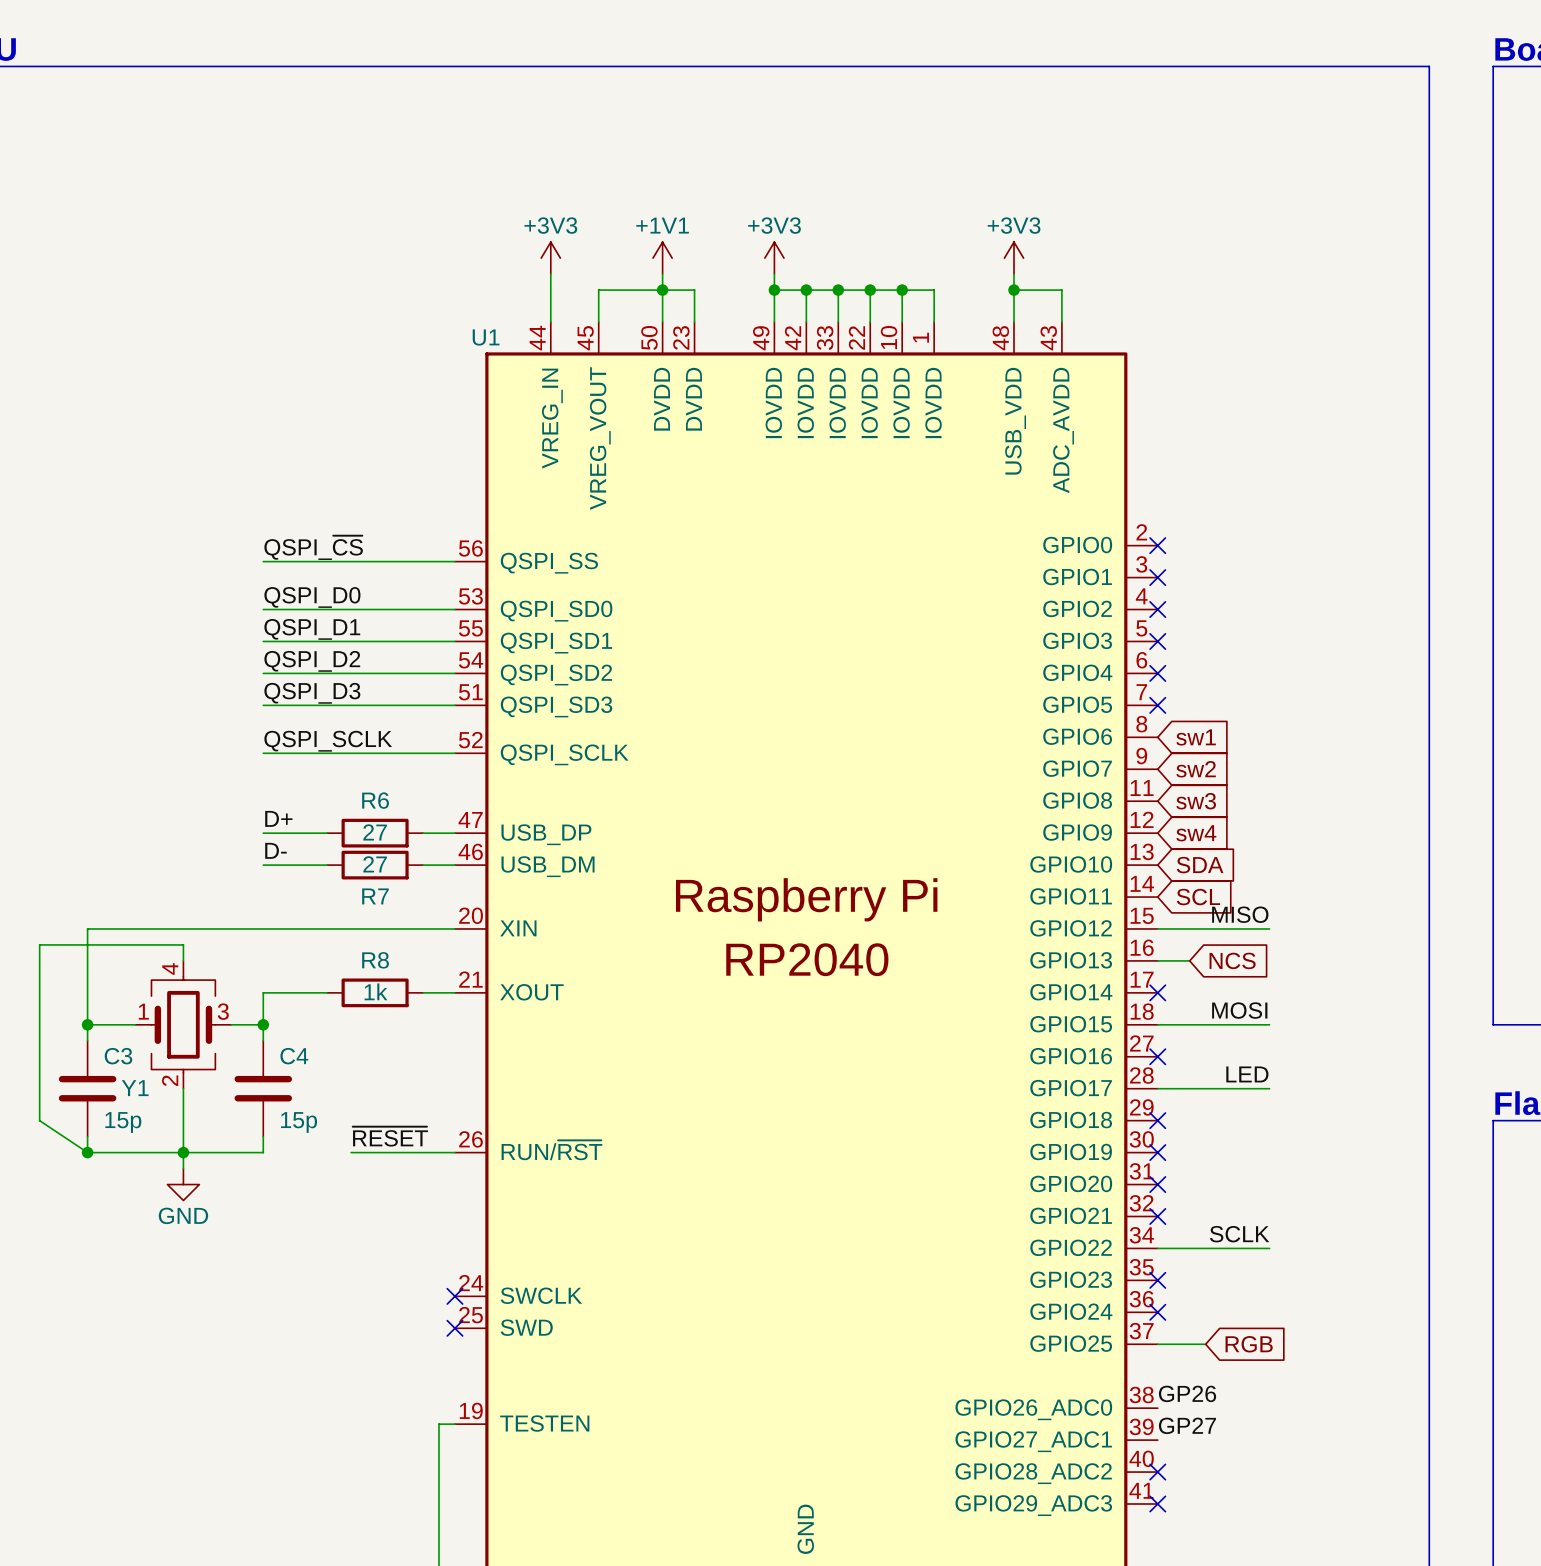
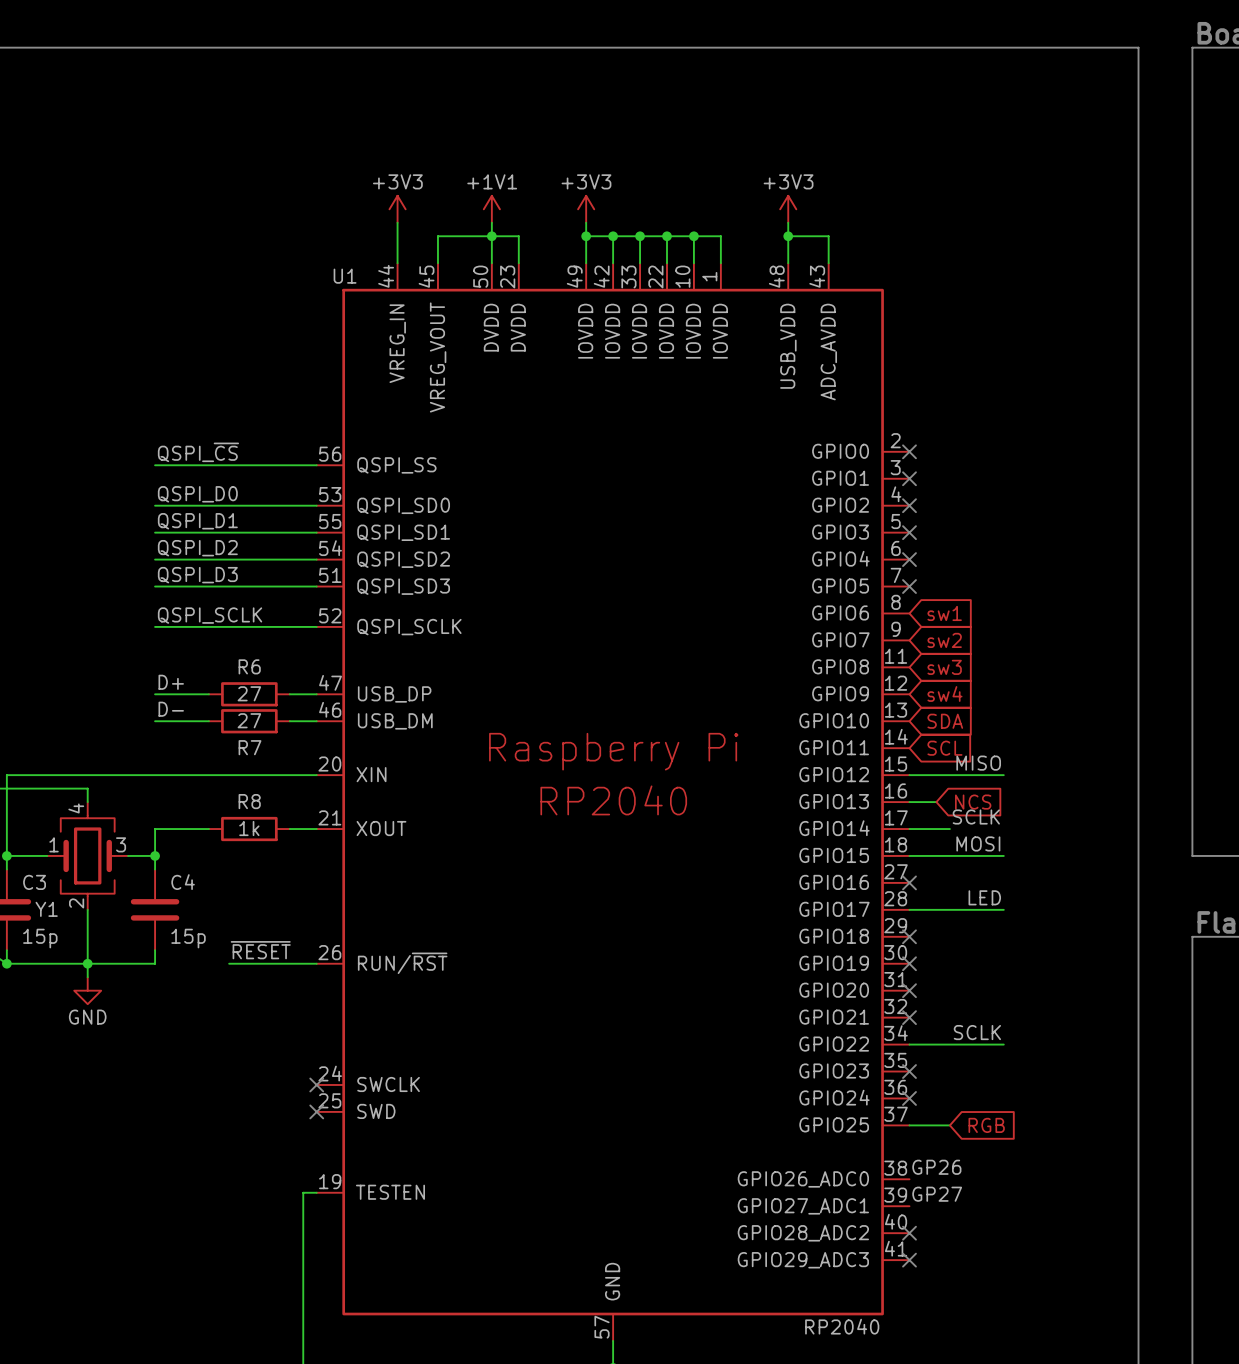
label: none -> SCLK (976, 817)
wire: none -> (909, 829) (949, 829)
no-connect mark: (1157, 992) -> none

